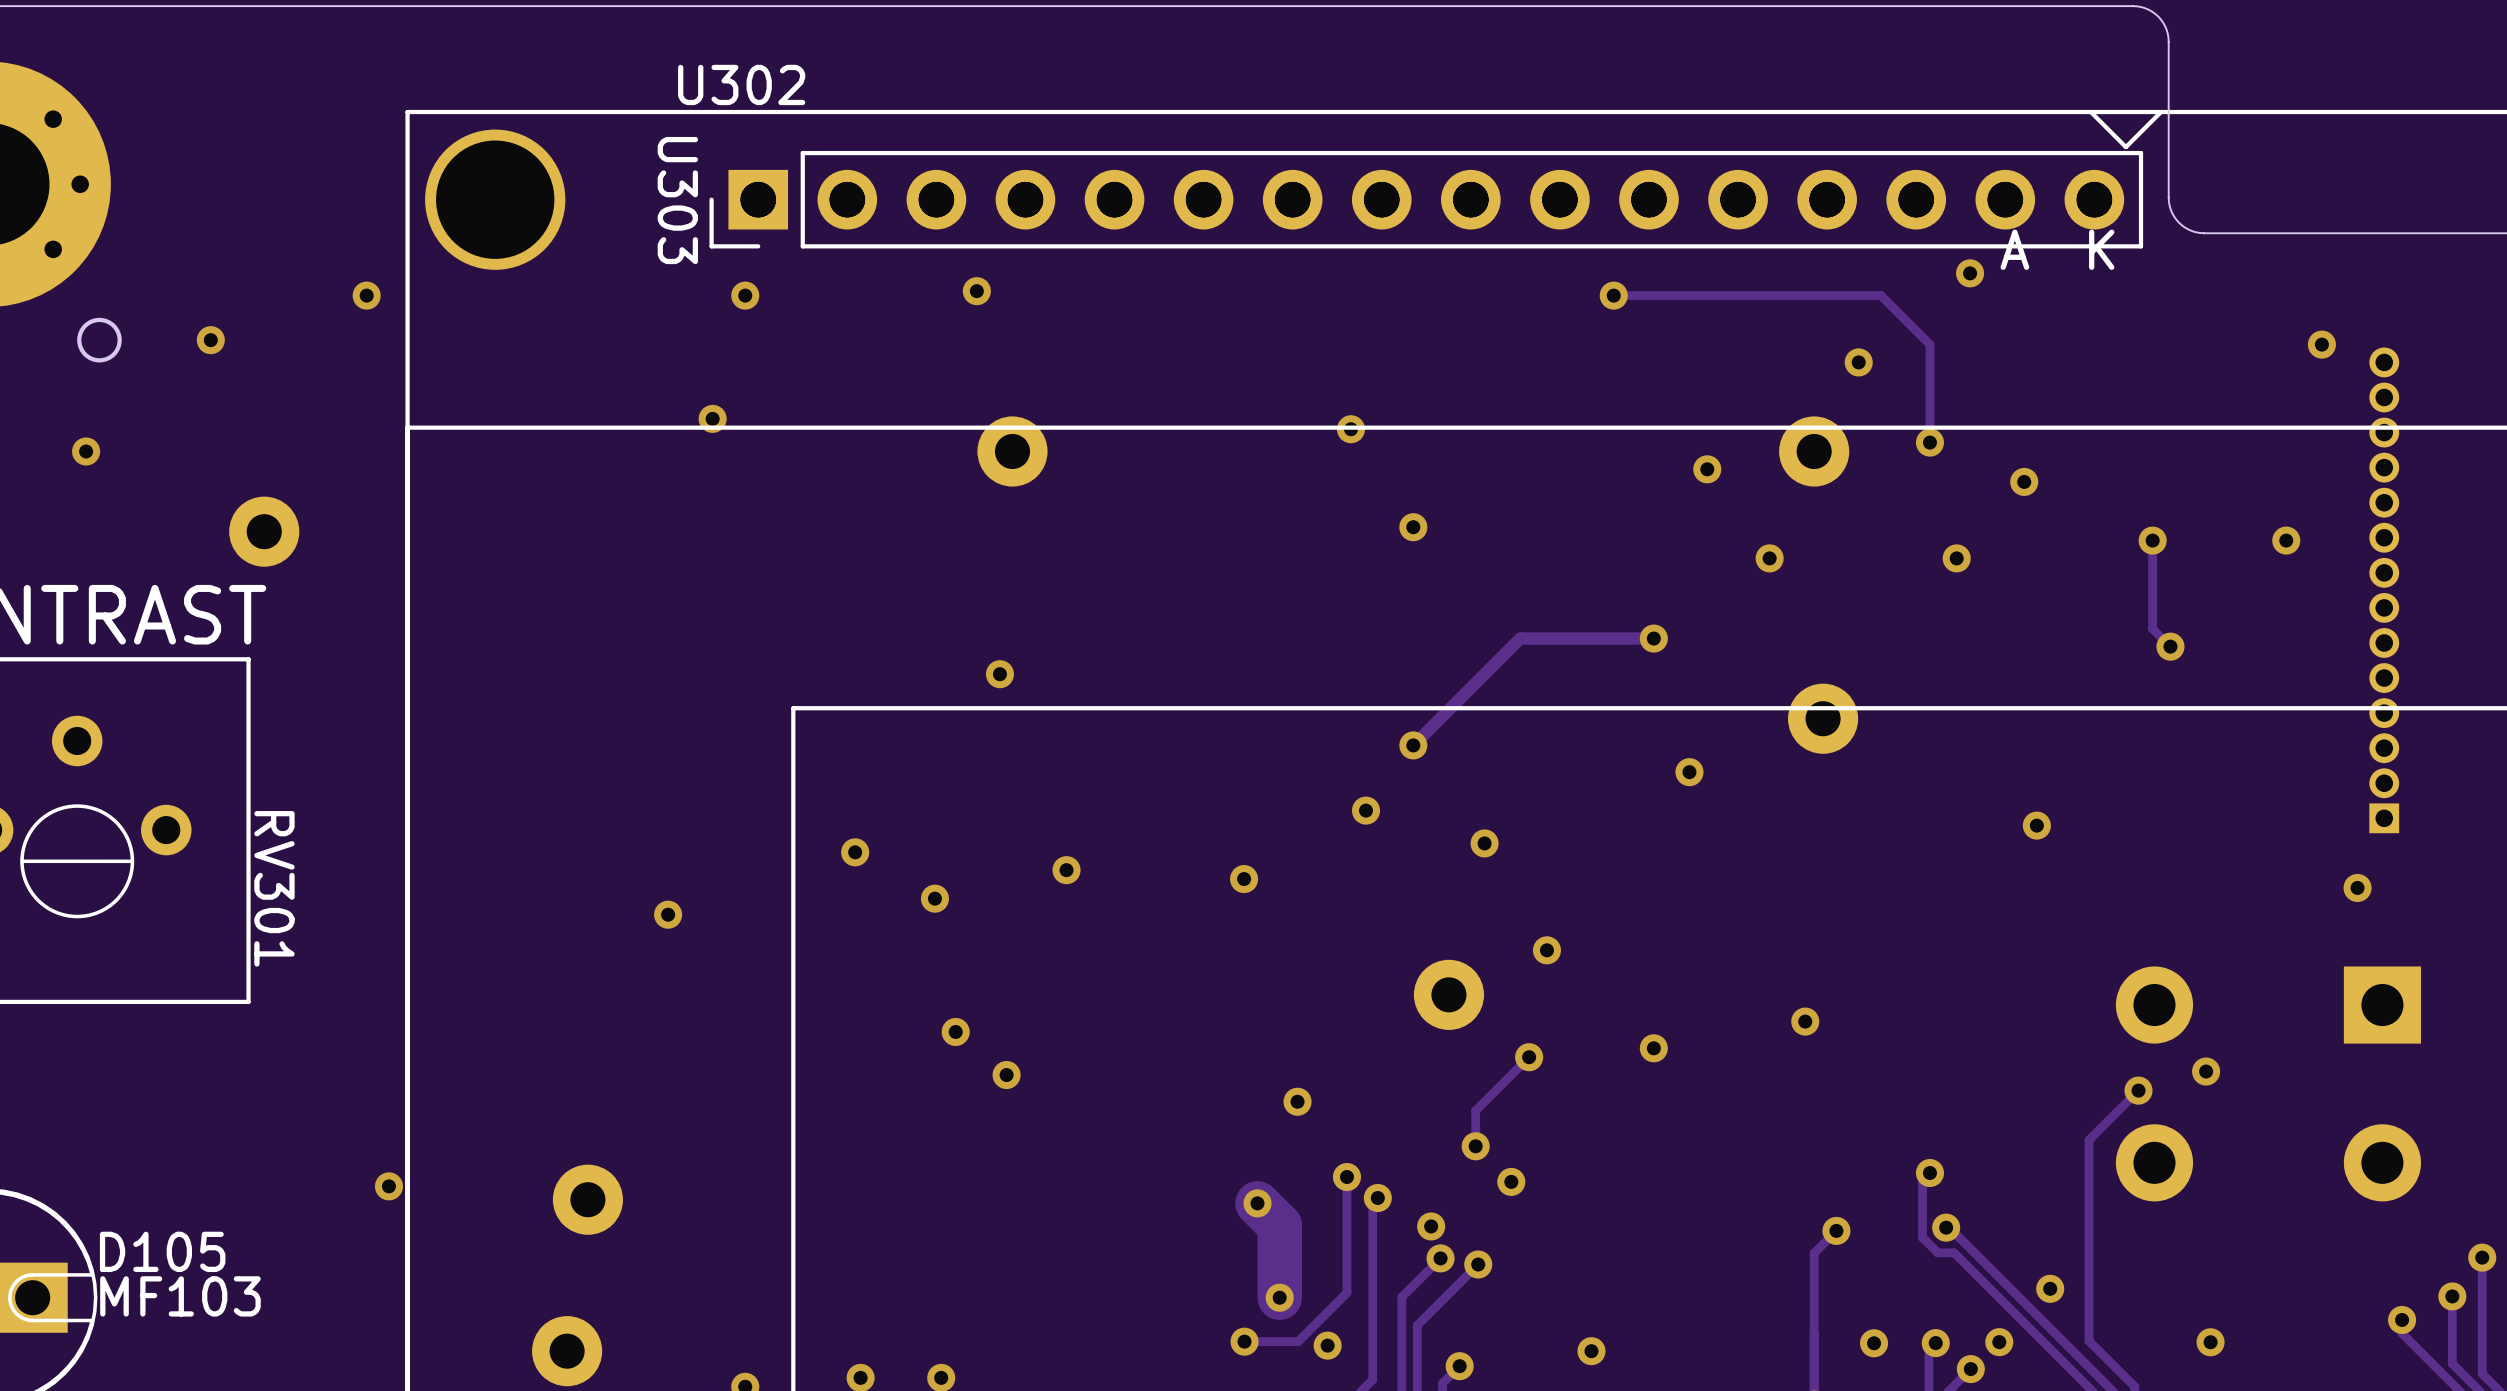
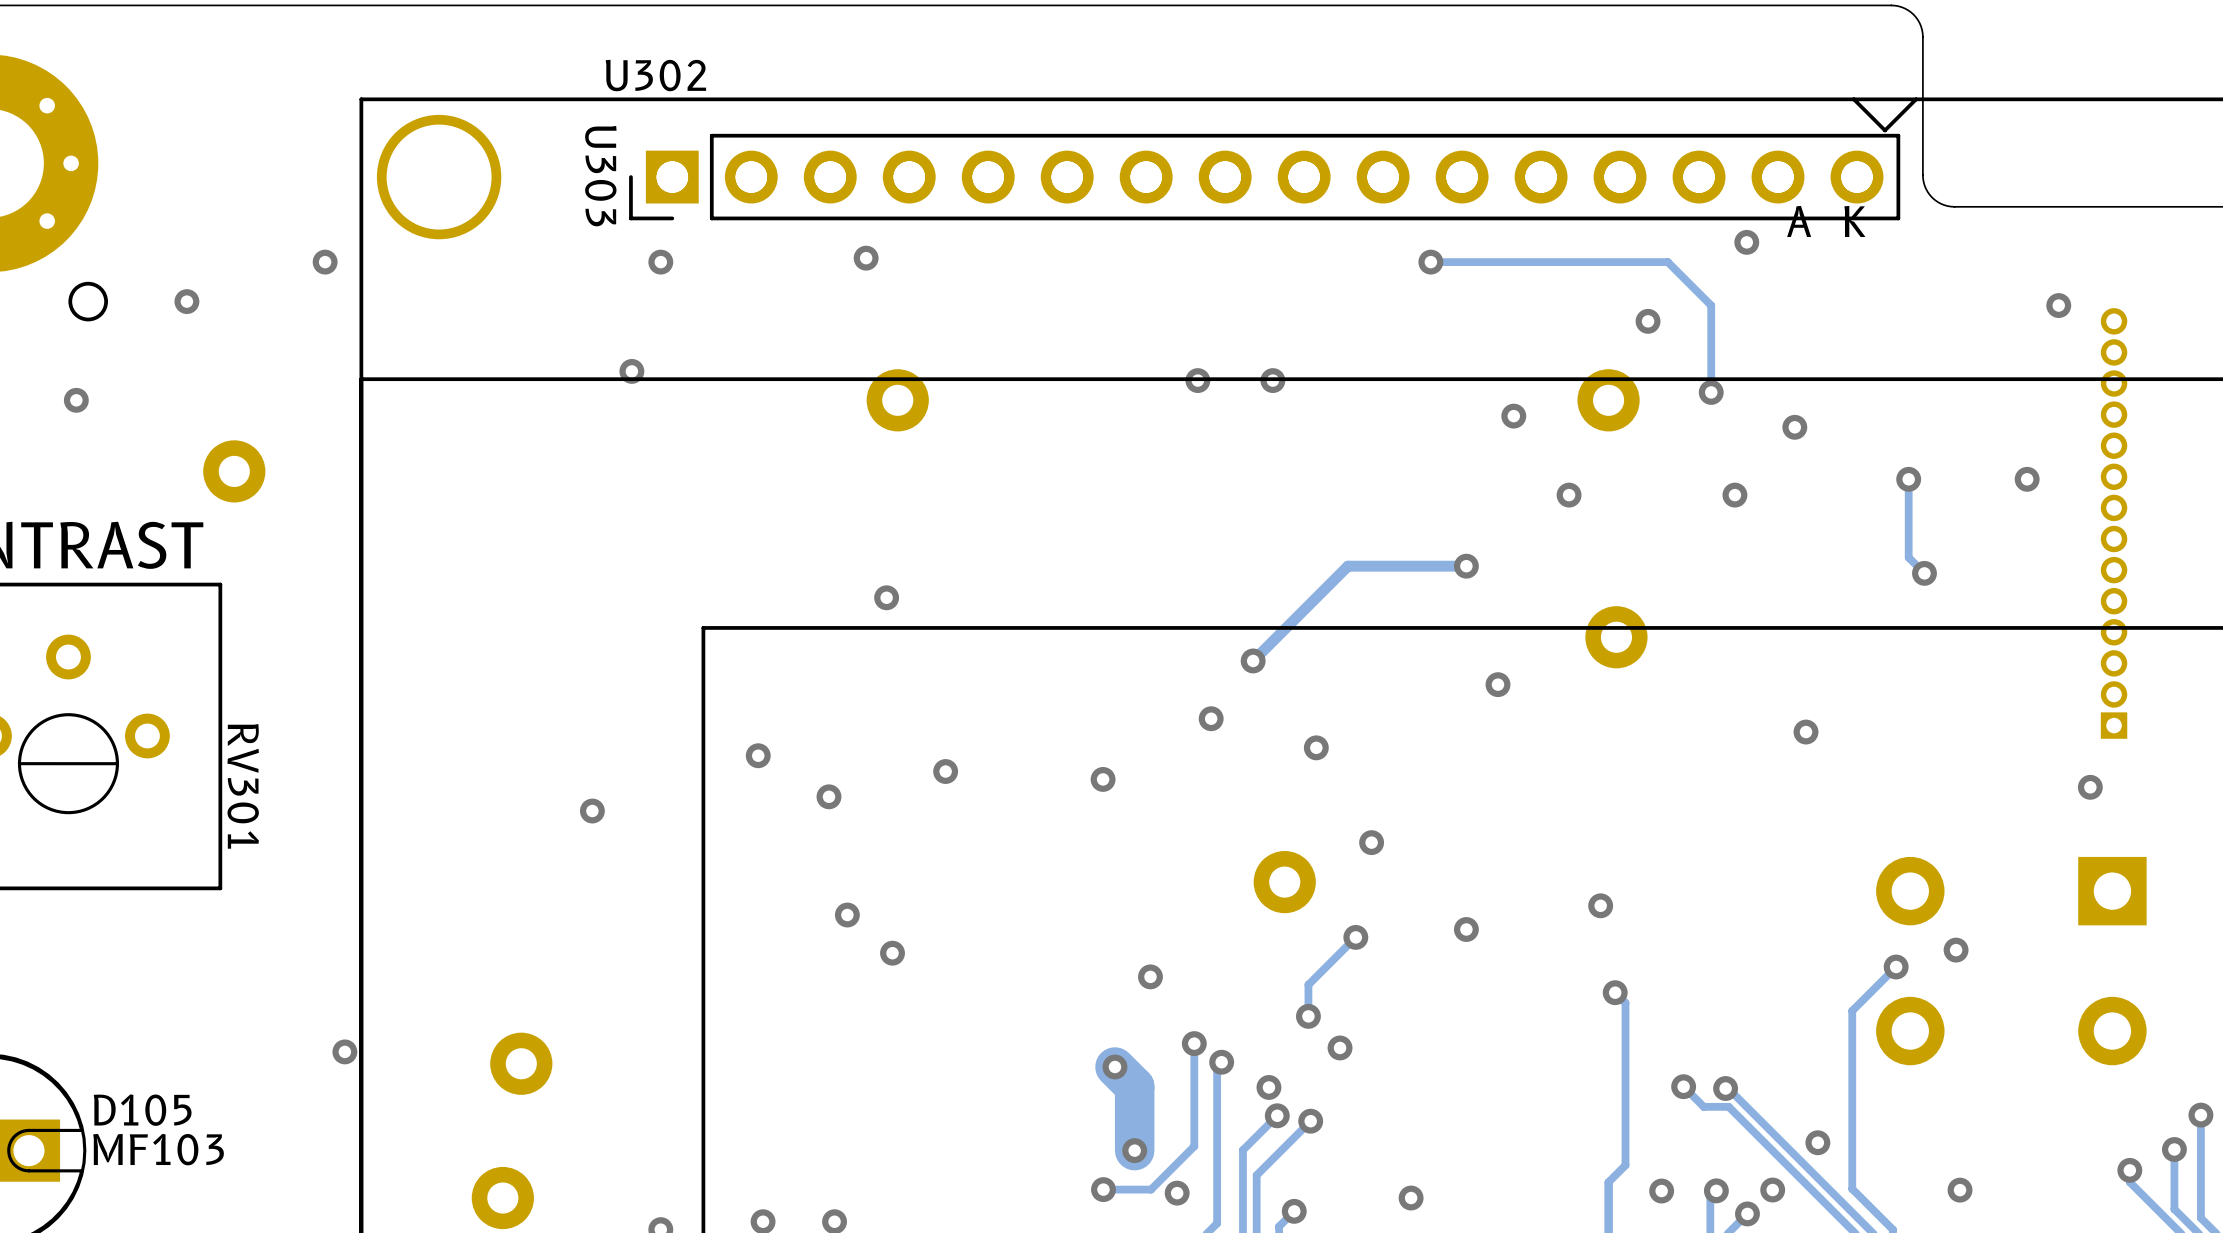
via position: (1413, 527) -> (1272, 380)
via: none -> (1615, 992)
track: (1929, 1173) (1922, 1180) (1922, 1237) (1937, 1252) (1954, 1252) -> (1683, 1086) (1703, 1106) (1728, 1106) (1732, 1110)
via: (1929, 1173) -> none
via: none -> (1683, 1086)
track: (1836, 1230) (1814, 1253) (1814, 1333) -> (1615, 992) (1625, 1002) (1625, 1165) (1608, 1182)
via: (1836, 1230) -> none

